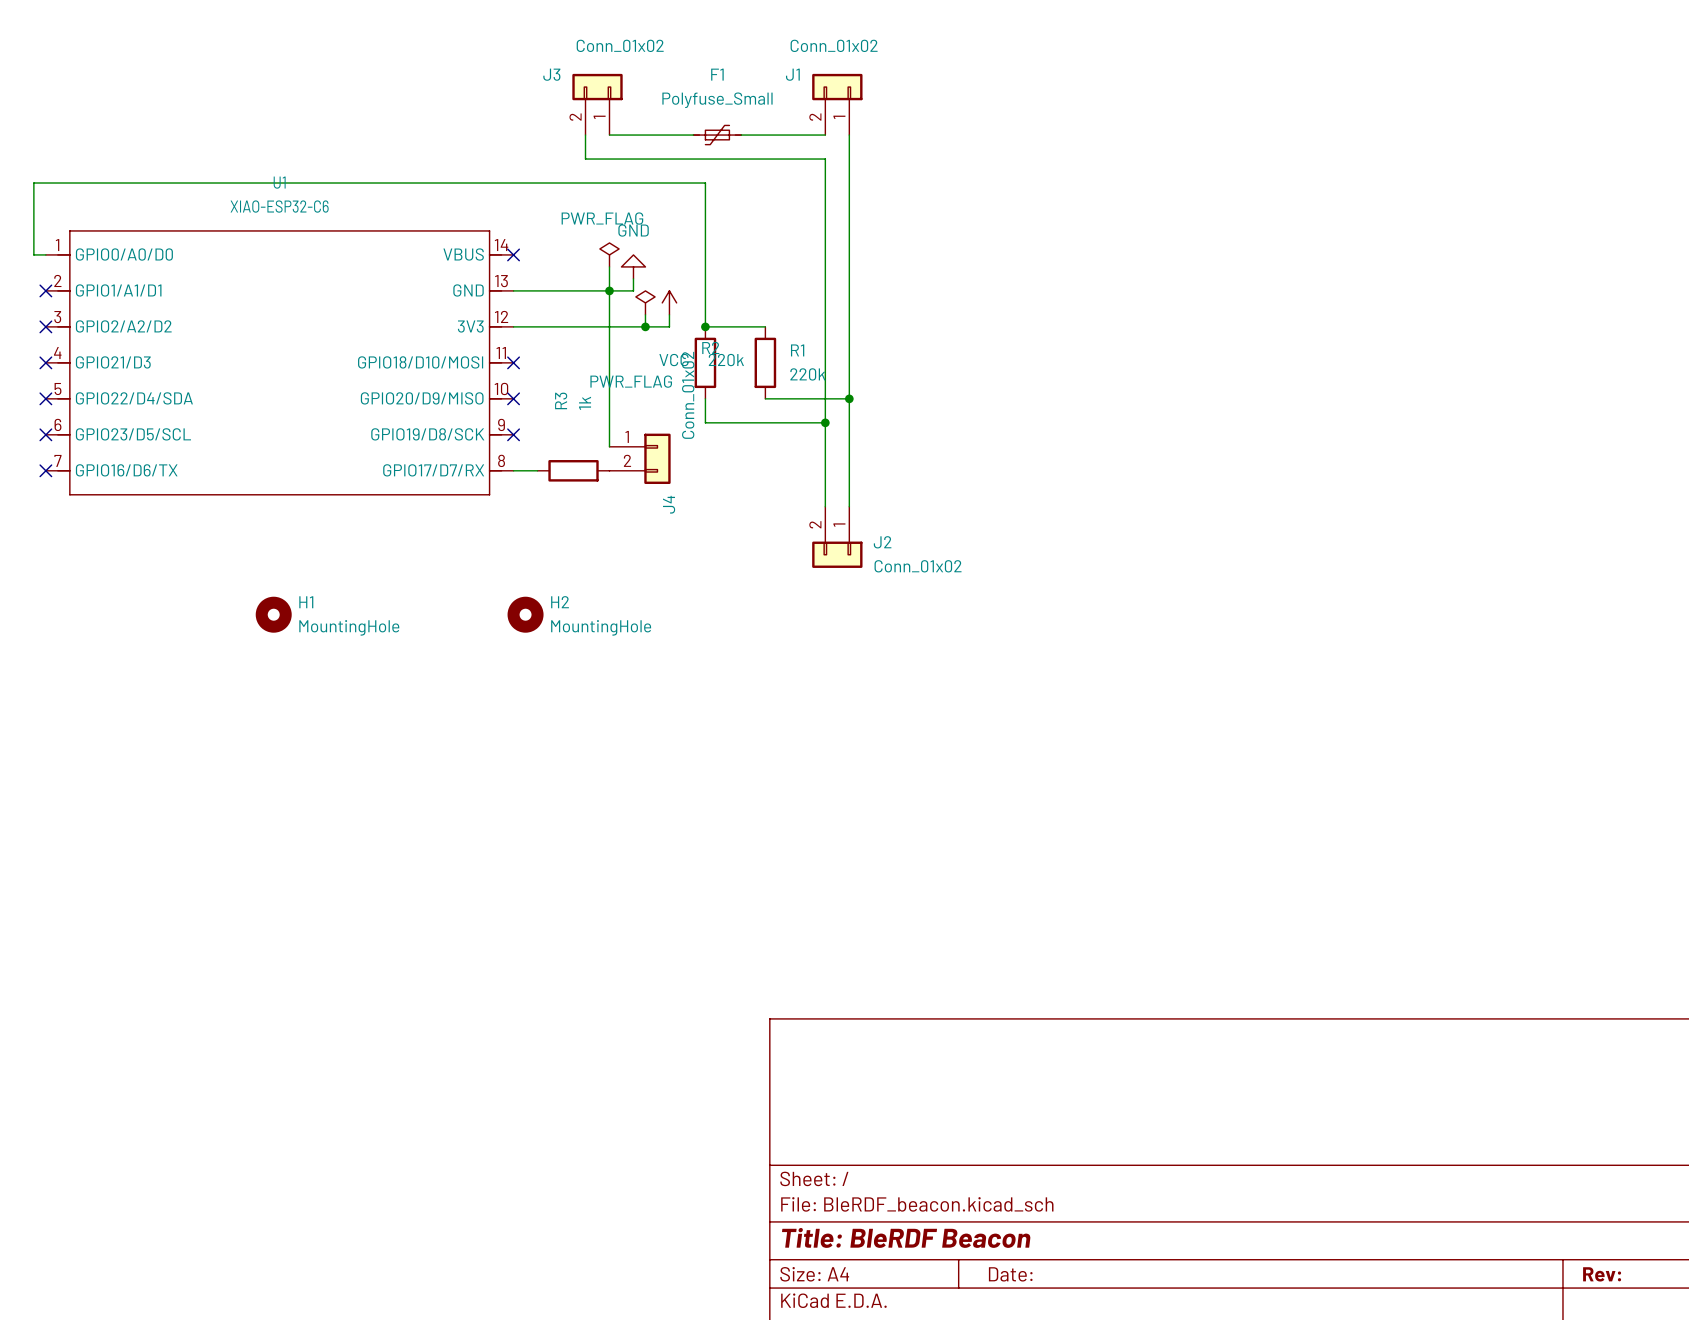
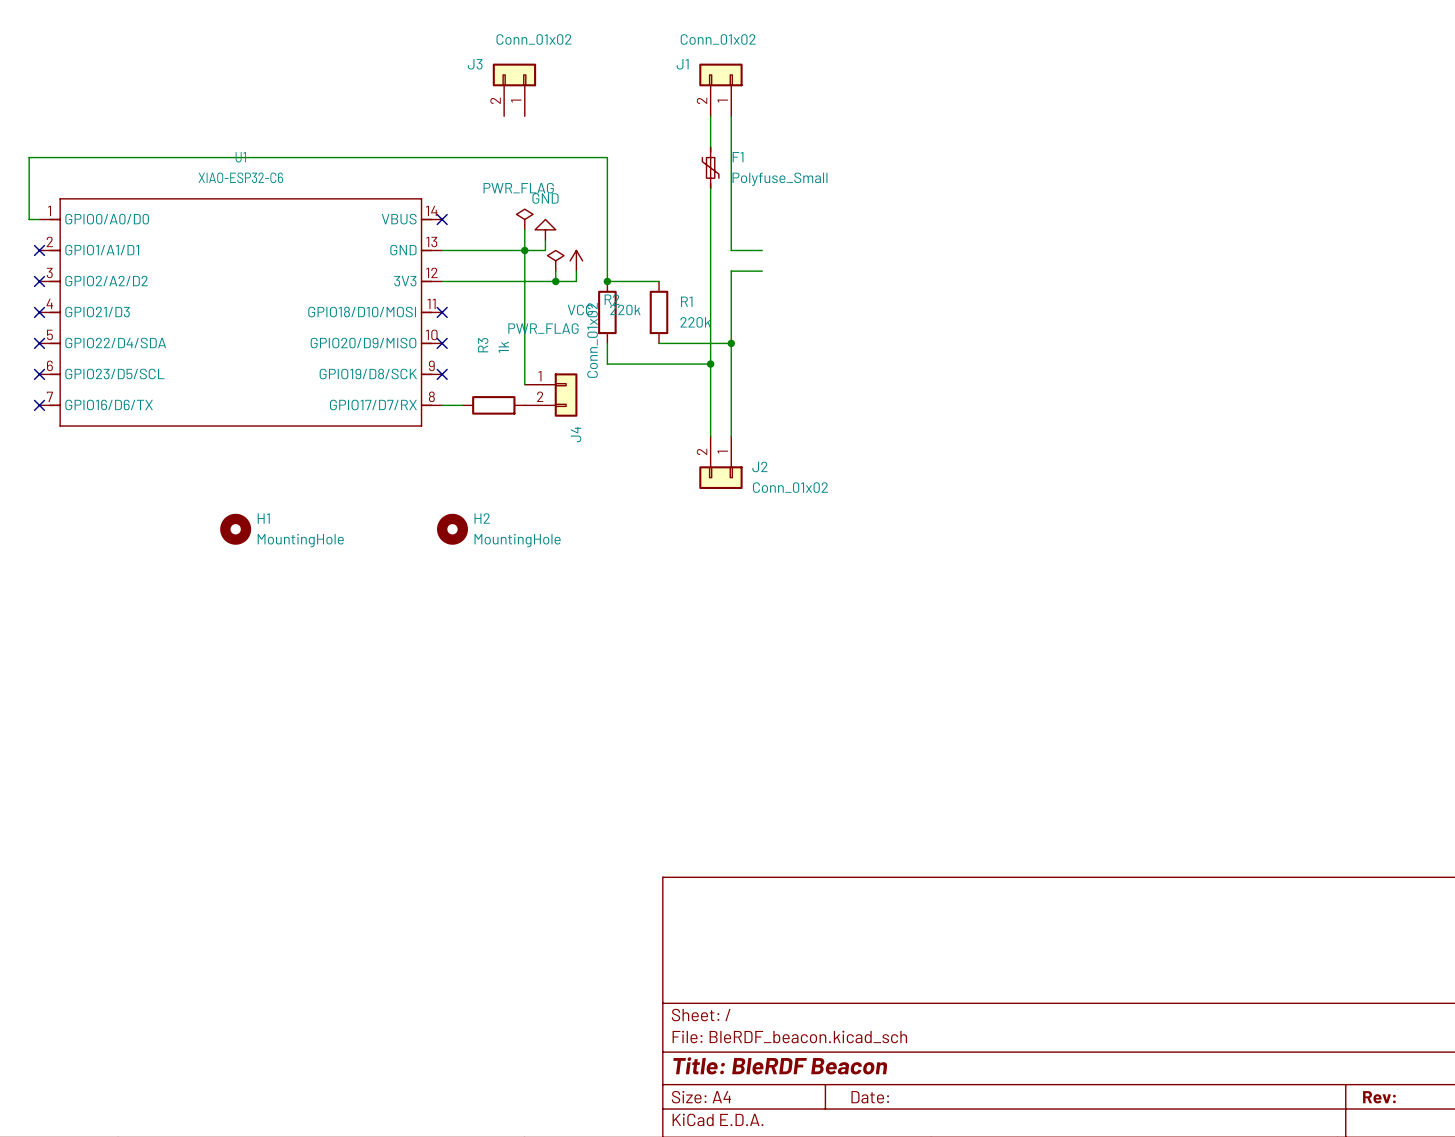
F1 name position: F1 (717, 74) -> F1 (738, 157)
F1 value position: Polyfuse_Small (717, 100) -> Polyfuse_Small (780, 179)
wire: (585, 135) (585, 159) (825, 159) -> none
wire: (609, 135) (693, 135) -> none
F1 rotation: 0° (717, 135) -> 90° clockwise (710, 167)
F1 position: (717, 135) -> (710, 167)
wire: (741, 135) (825, 135) -> (710, 136) (710, 116)
wire: (849, 290) (849, 314) -> (731, 250) (762, 250)
wire: none -> (731, 271) (762, 271)

